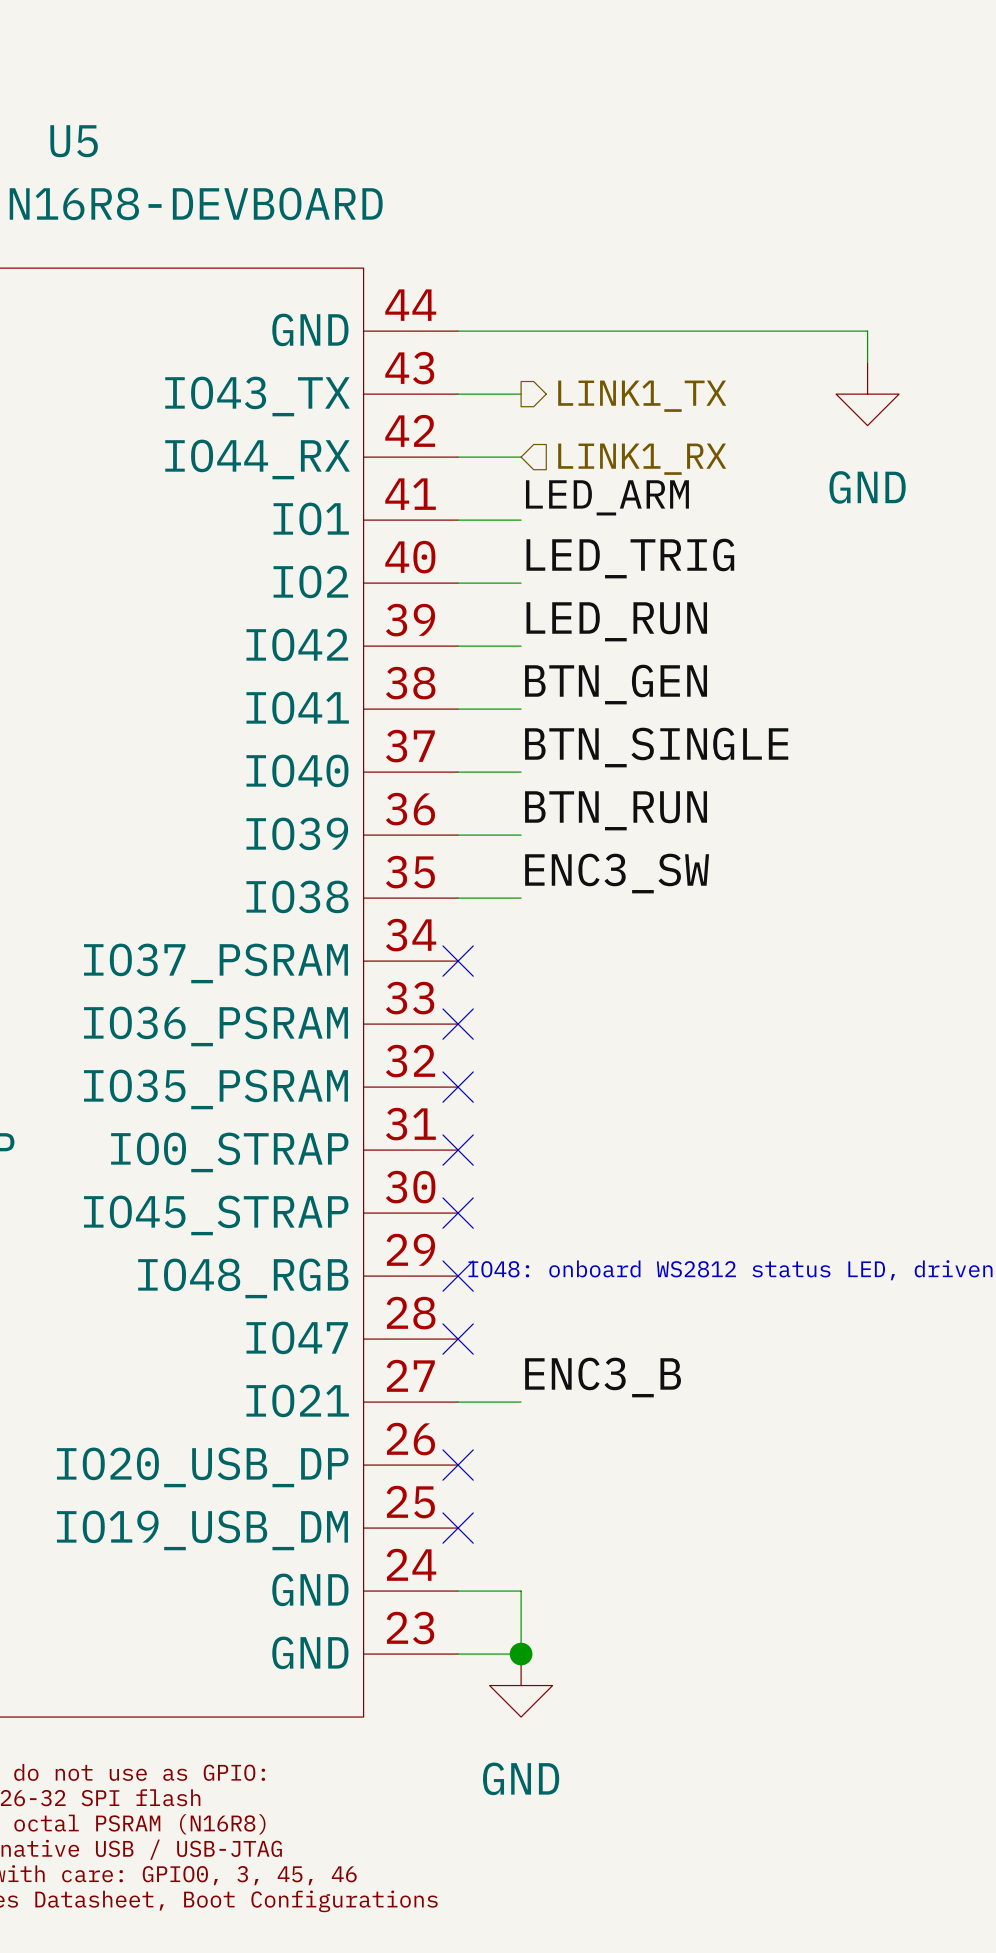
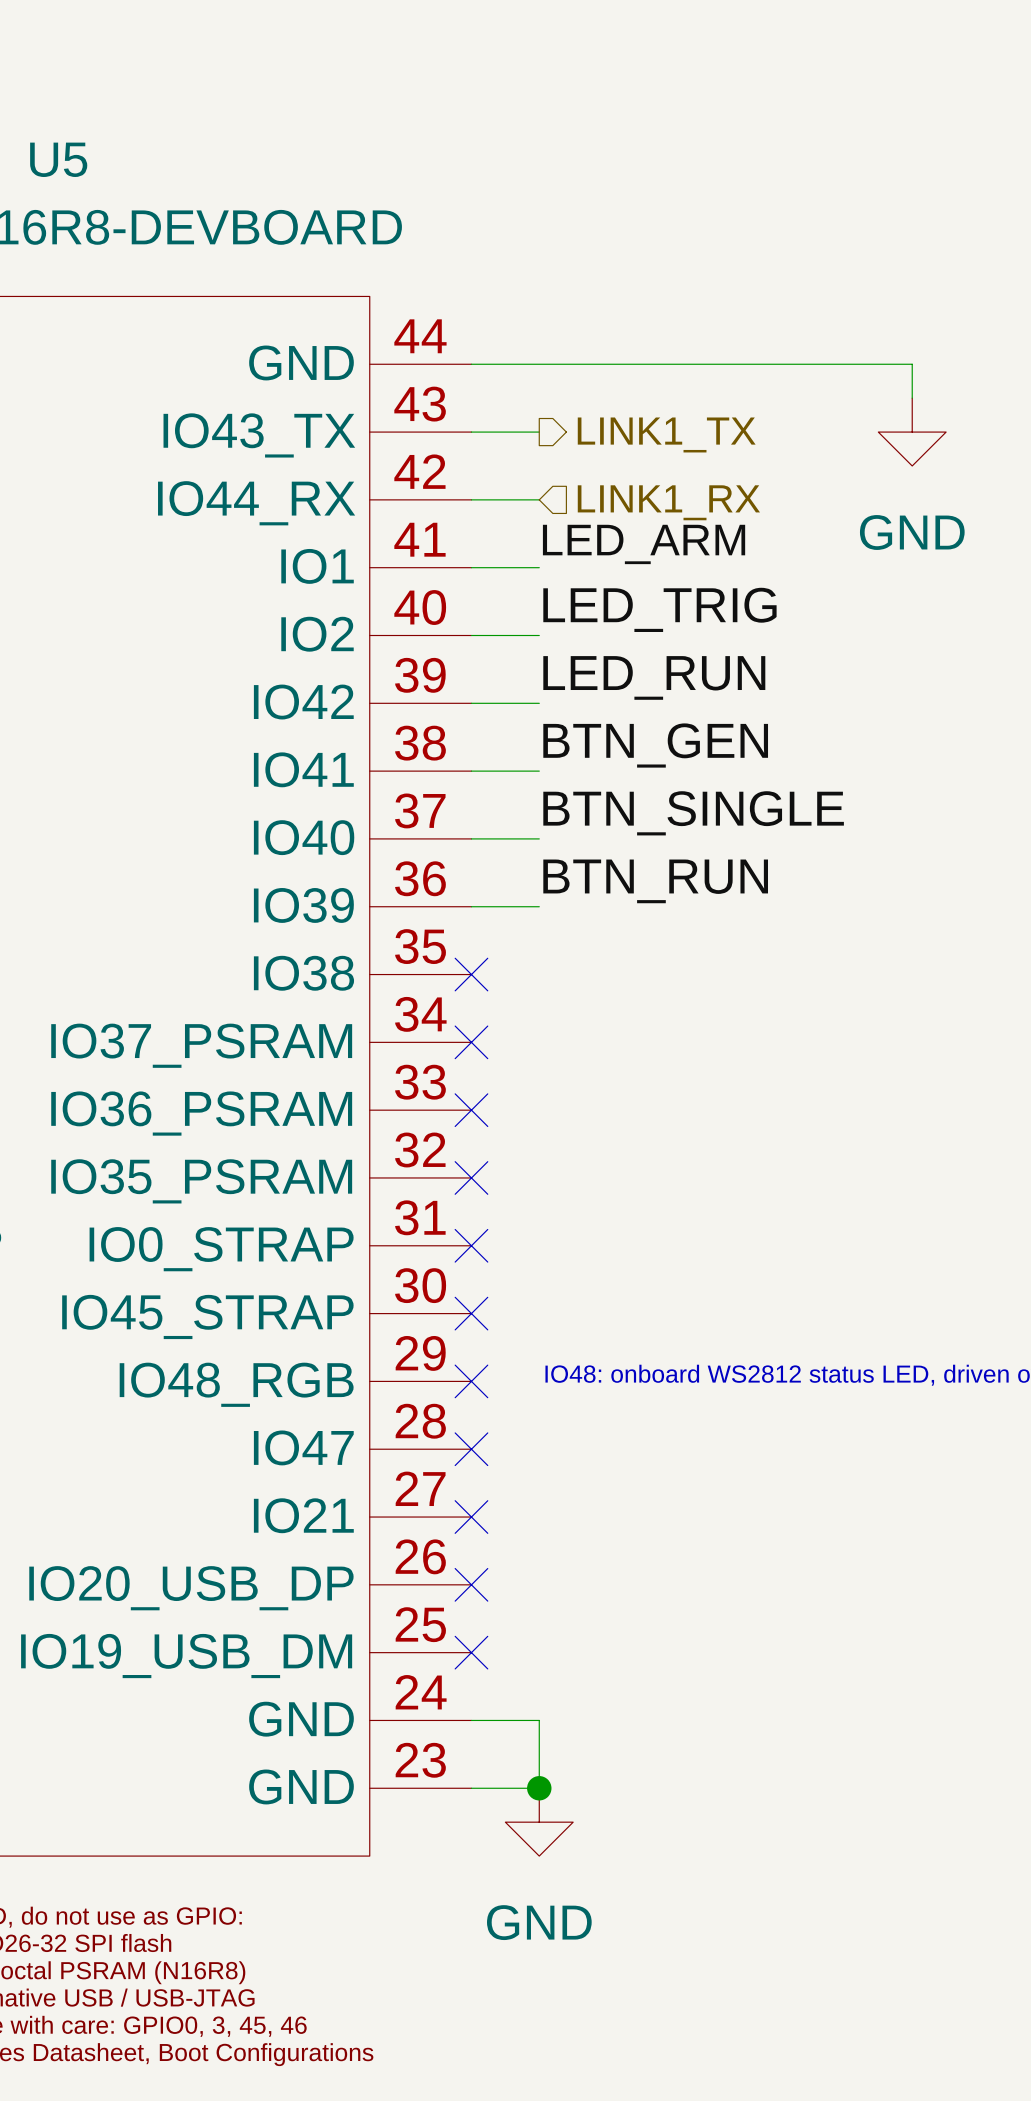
label: ENC3_SW (617, 873) -> none
wire: (458, 898) (521, 898) -> none
no-connect mark: none -> (471, 974)
label: ENC3_B (603, 1377) -> none
wire: (458, 1402) (521, 1402) -> none
no-connect mark: none -> (471, 1517)

